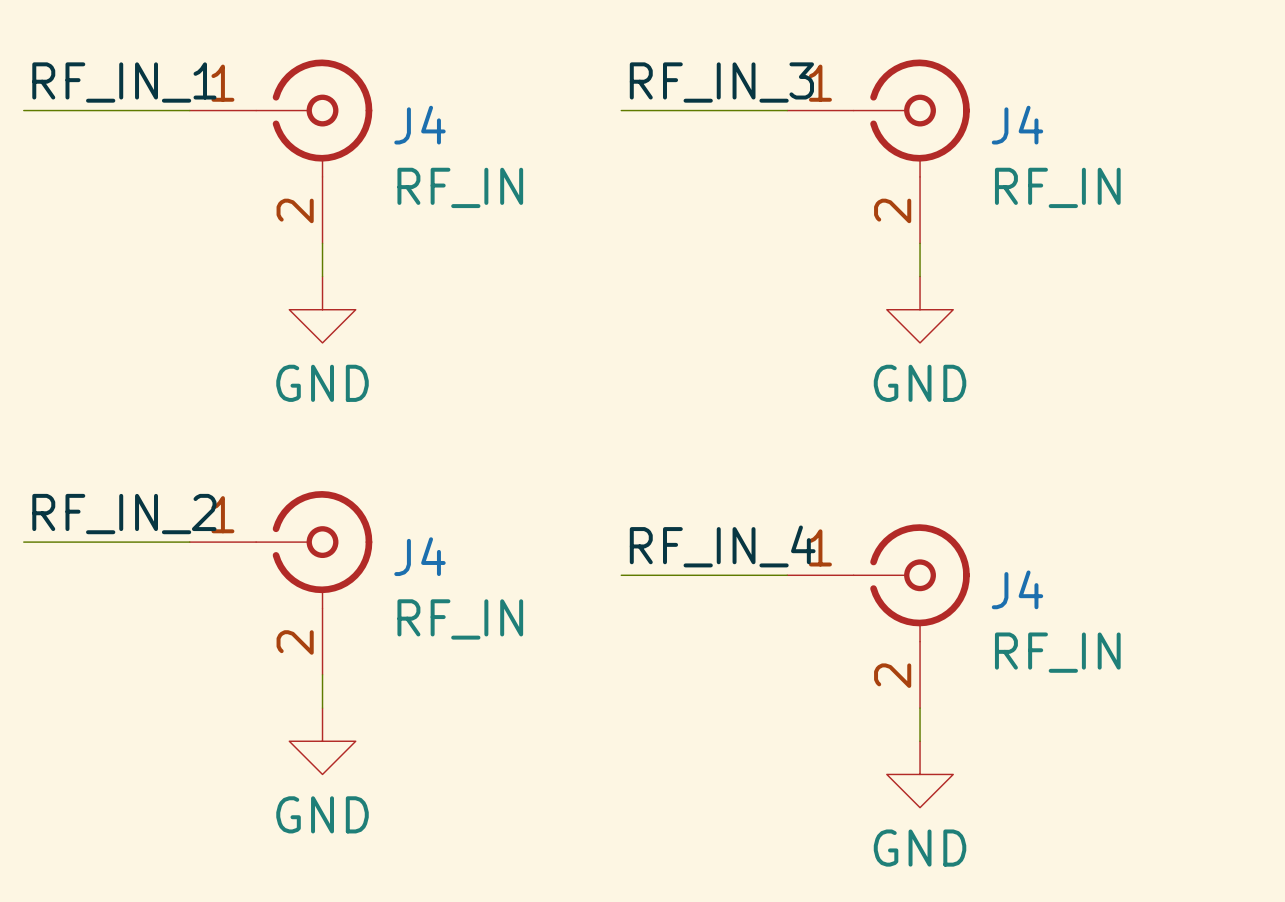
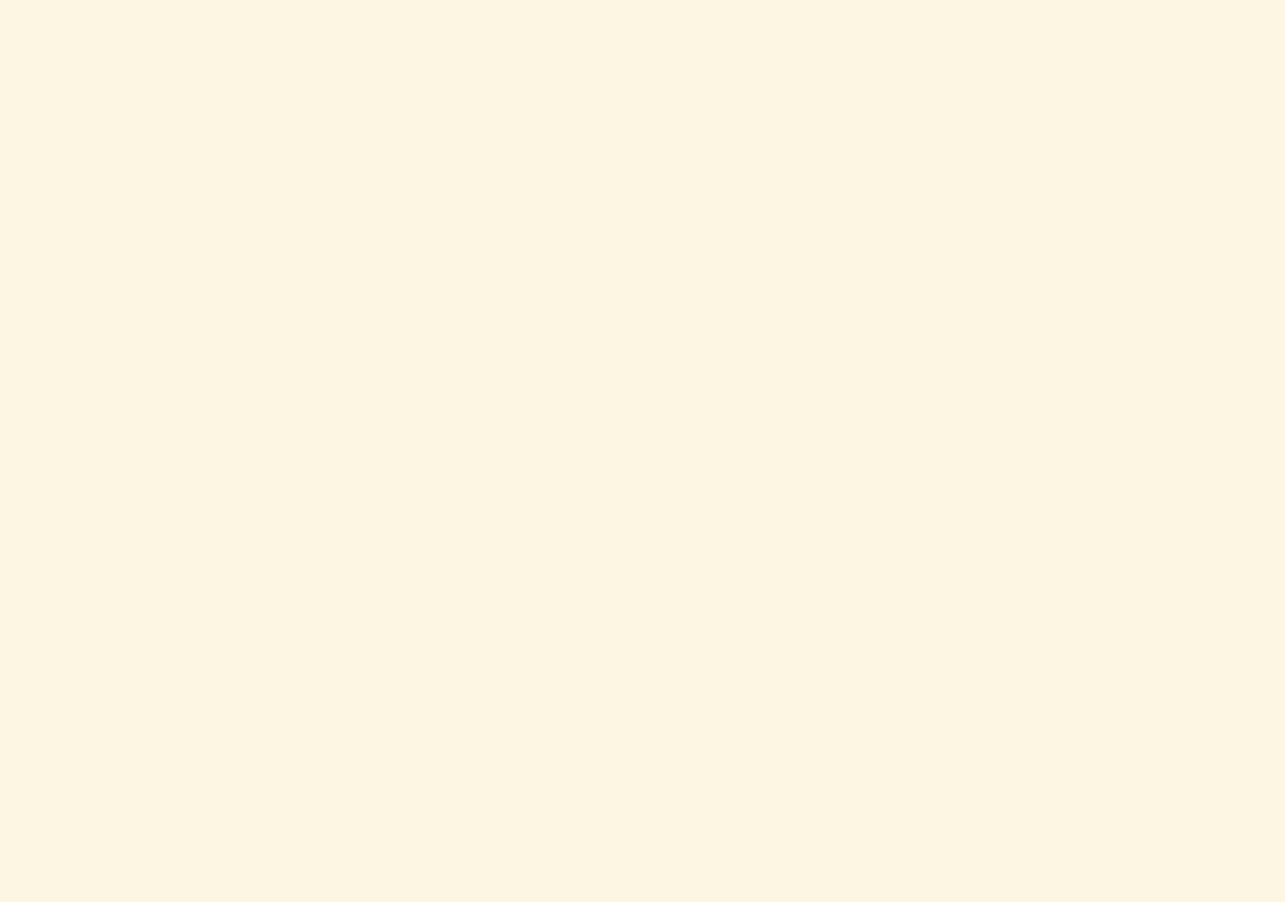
label: RF_IN_1 (124, 82) -> none
label: RF_IN_3 (721, 82) -> none
wire: (23, 110) (189, 110) -> none
wire: (621, 110) (787, 110) -> none
J4: RF_IN (281, 151) -> none
J4: RF_IN (878, 151) -> none
wire: (322, 243) (322, 276) -> none
wire: (920, 243) (920, 276) -> none
power symbol: GND (322, 309) -> none
power symbol: GND (920, 309) -> none
label: RF_IN_2 (124, 514) -> none
wire: (23, 542) (189, 542) -> none
label: RF_IN_4 (722, 546) -> none
wire: (621, 575) (787, 575) -> none
J4: RF_IN (281, 582) -> none
J4: RF_IN (878, 616) -> none
wire: (322, 674) (322, 708) -> none
wire: (920, 708) (920, 741) -> none
power symbol: GND (322, 741) -> none
power symbol: GND (920, 774) -> none

